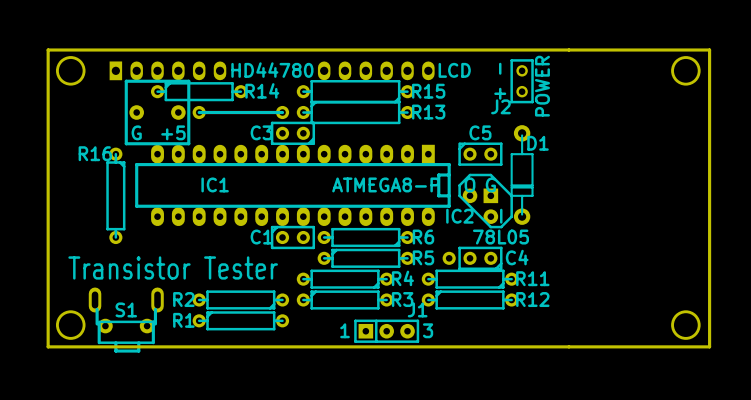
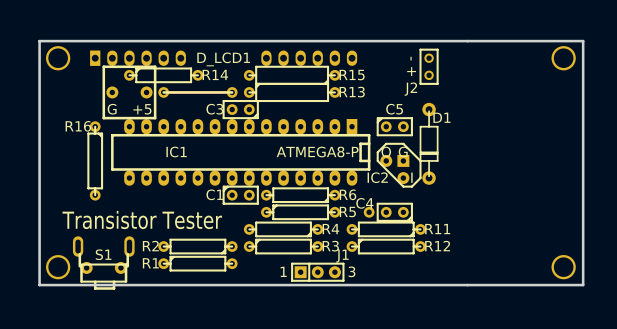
LCD: HD44780 (272, 70) -> none
D_LCD1: none -> (223, 58)
J2 value: POWER (542, 86) -> none
IC2 value: 78L05 (500, 237) -> none
C4 name position: C4 (517, 257) -> C4 (364, 203)

